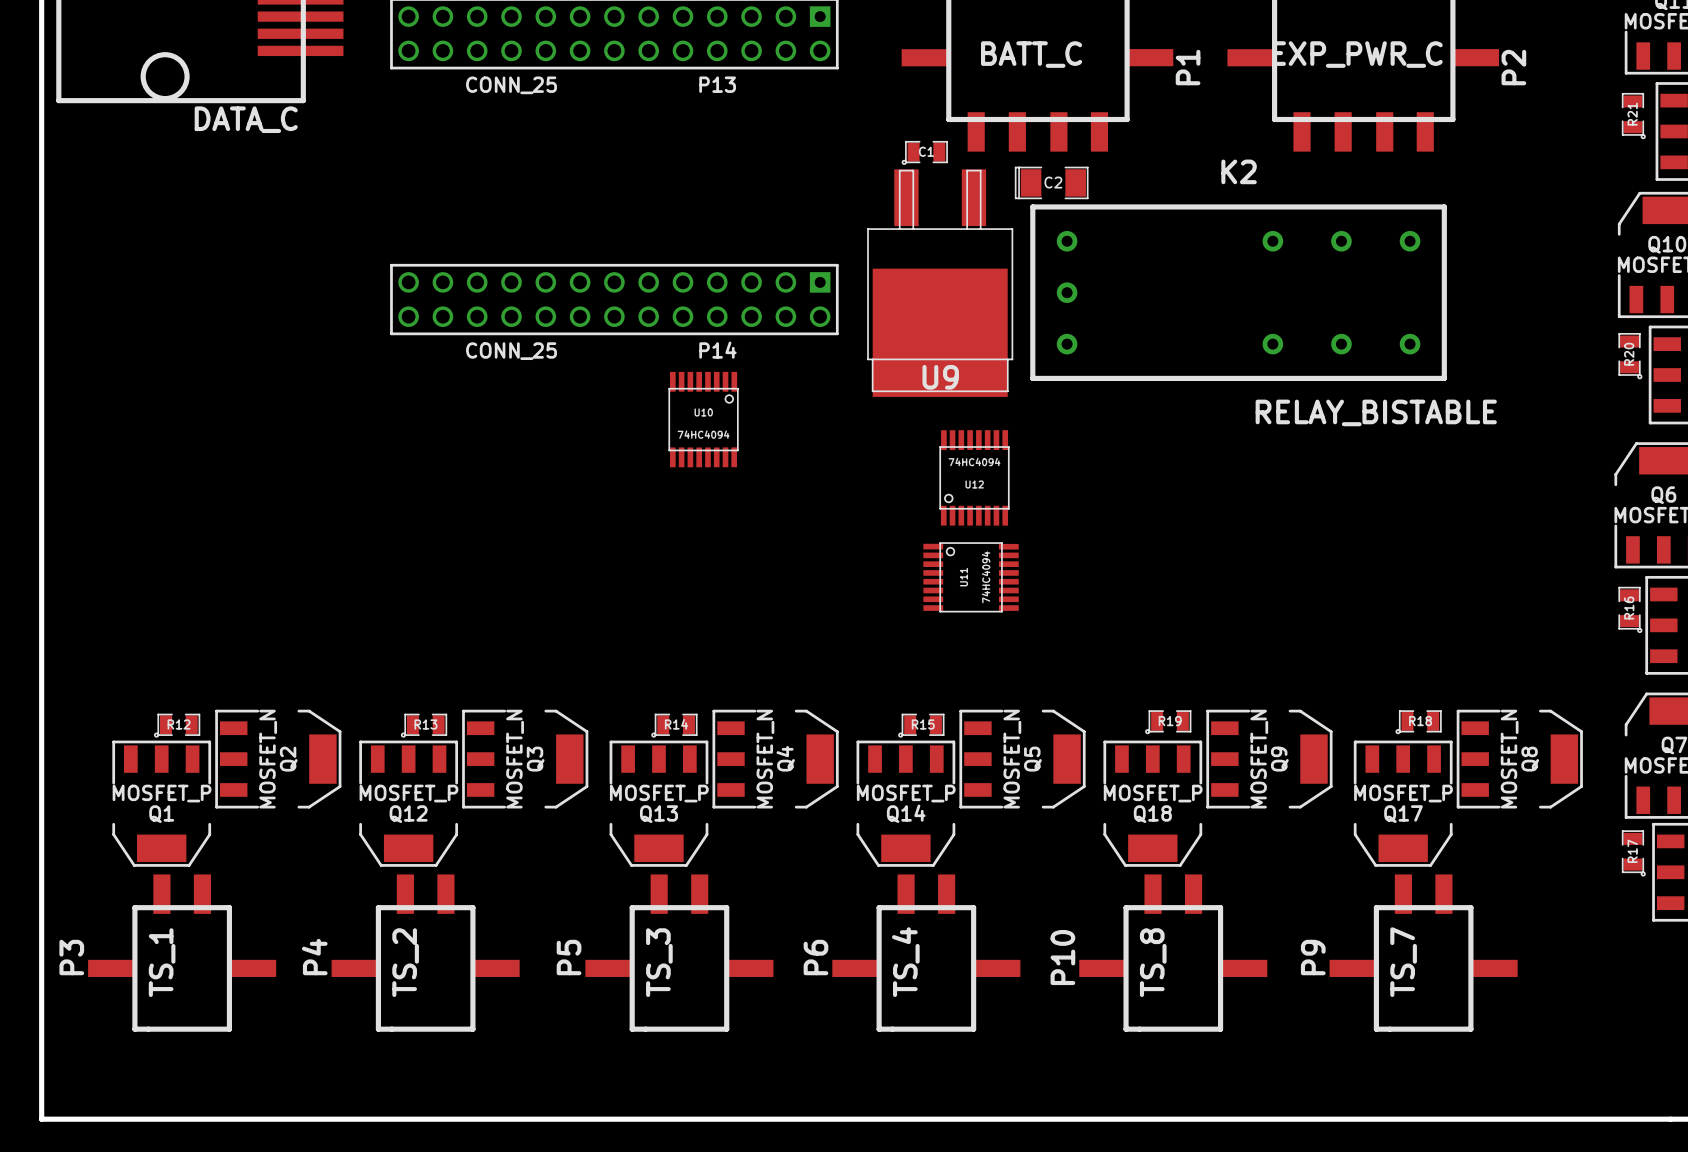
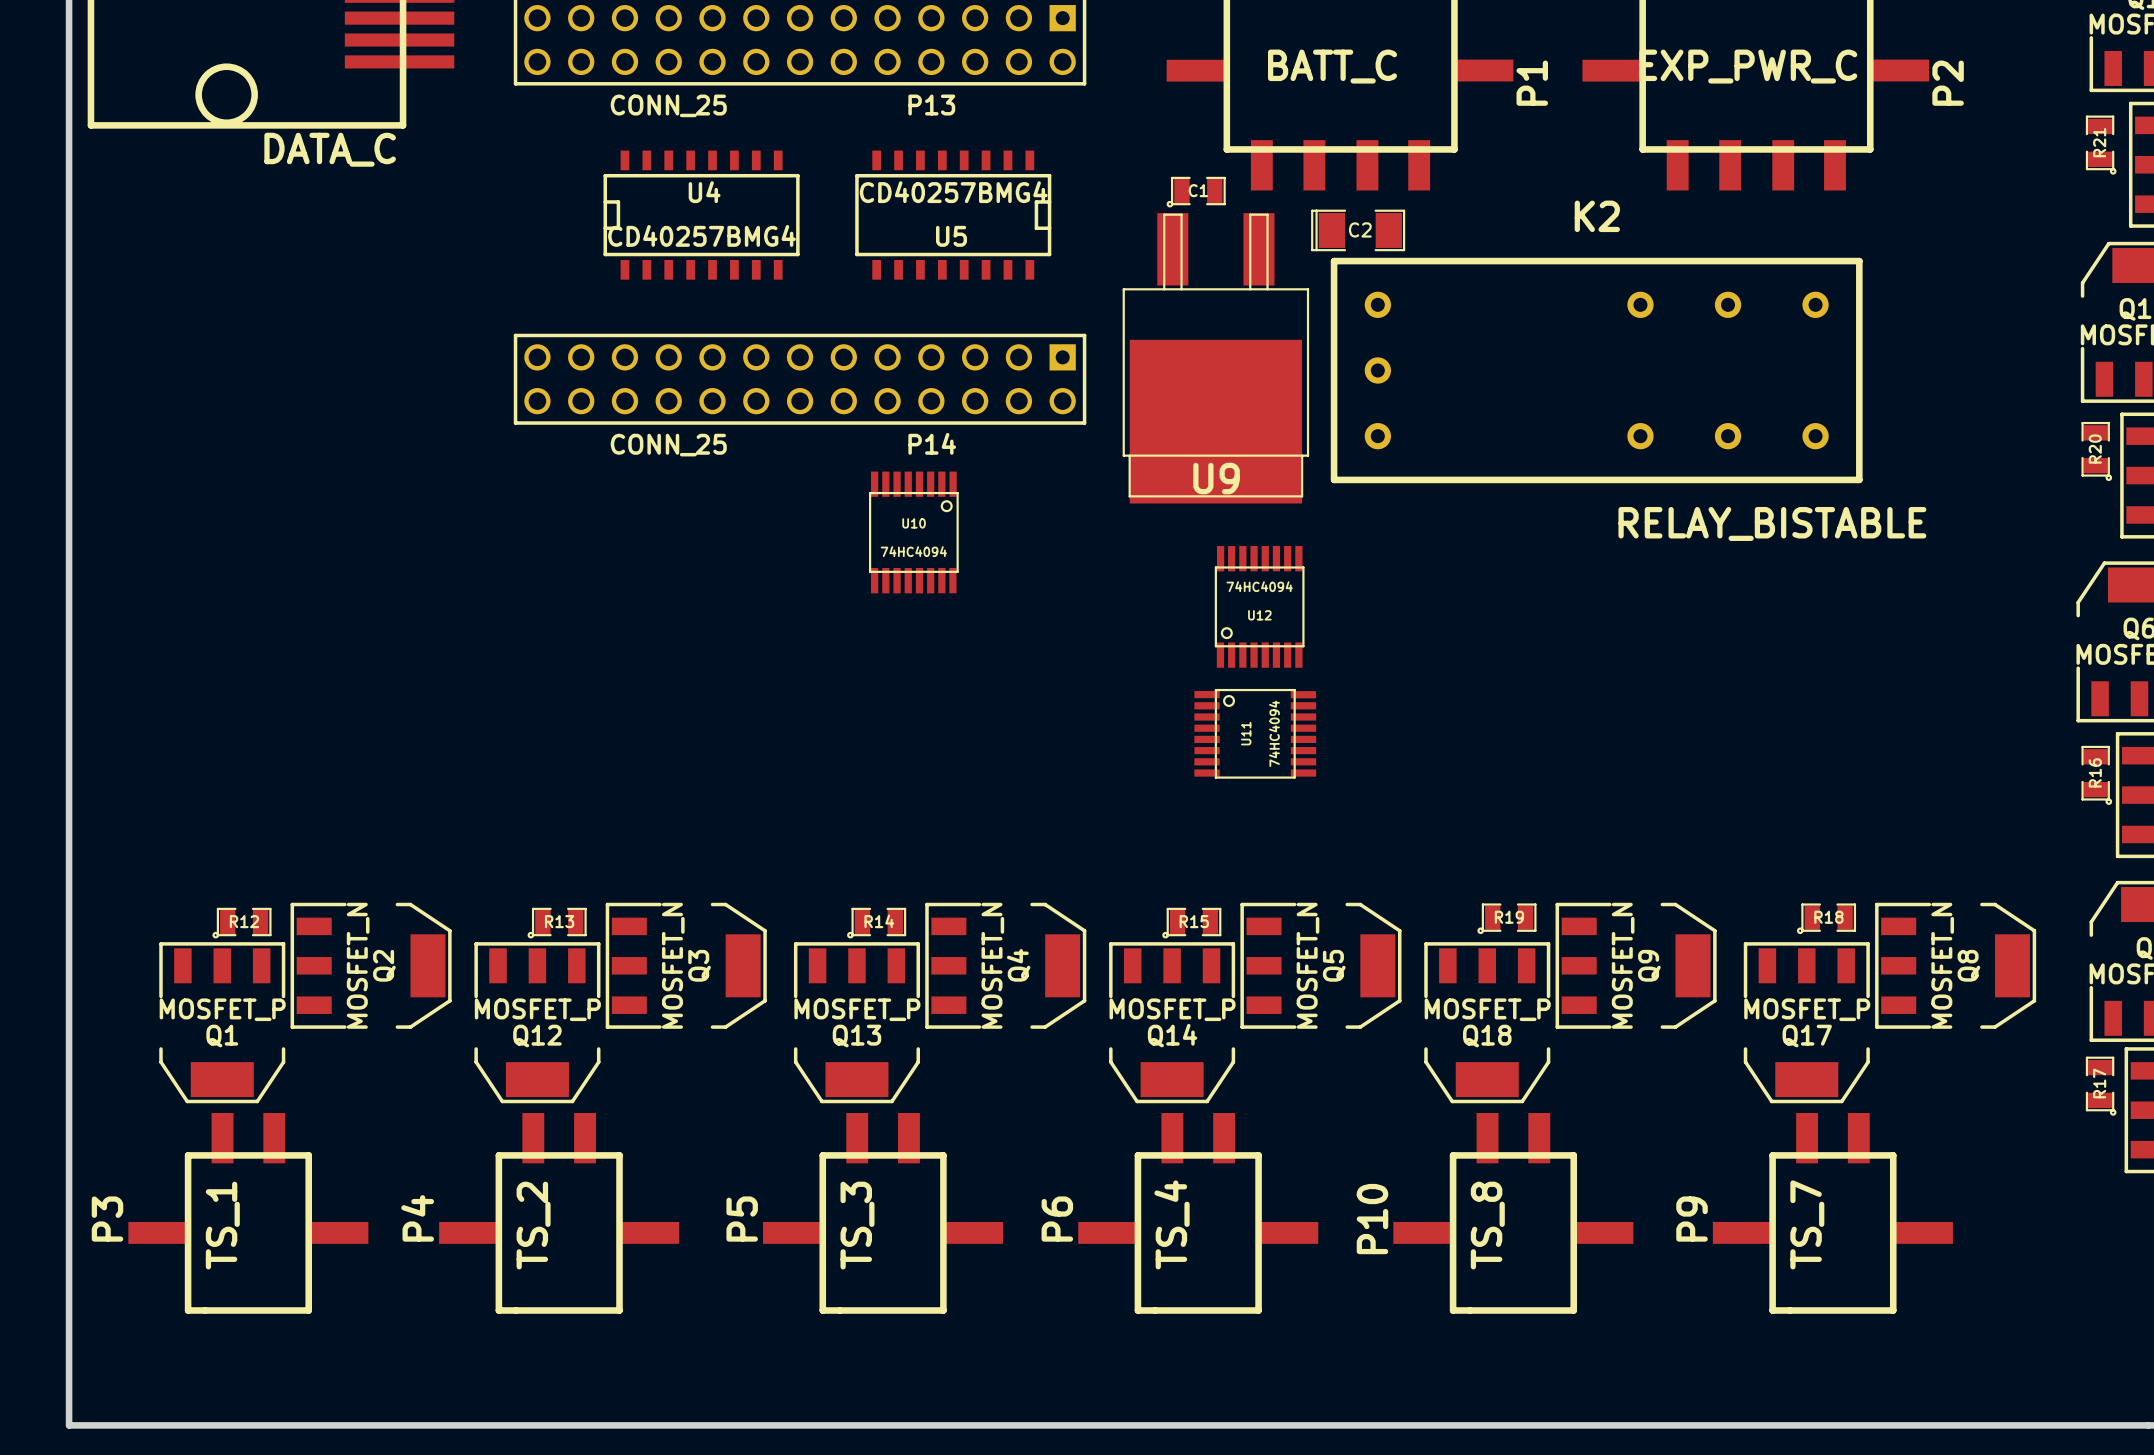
U4: none -> CD40257BMG4 (701, 215)
U5: none -> CD40257BMG4 (953, 215)

